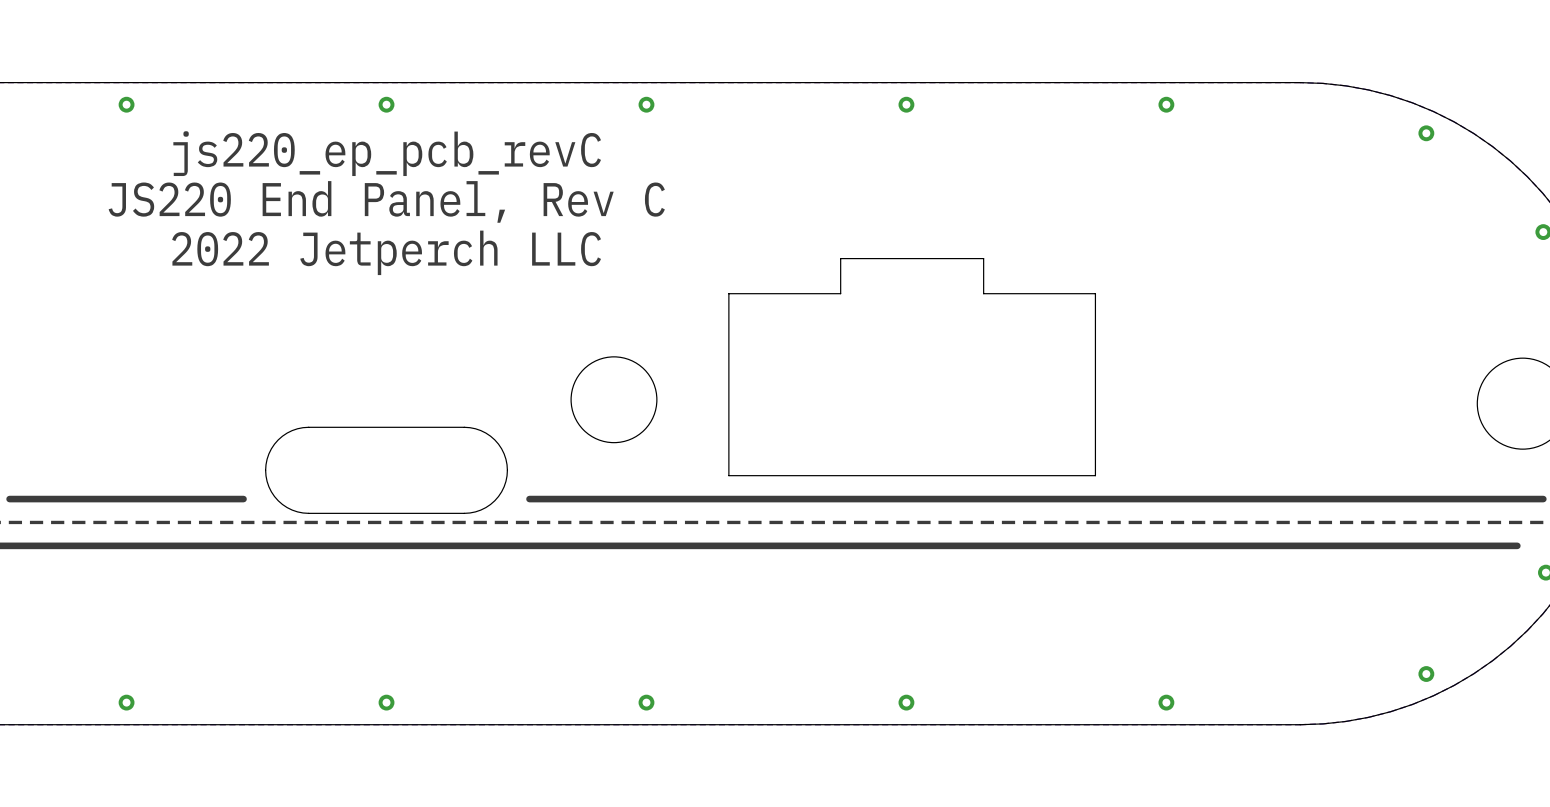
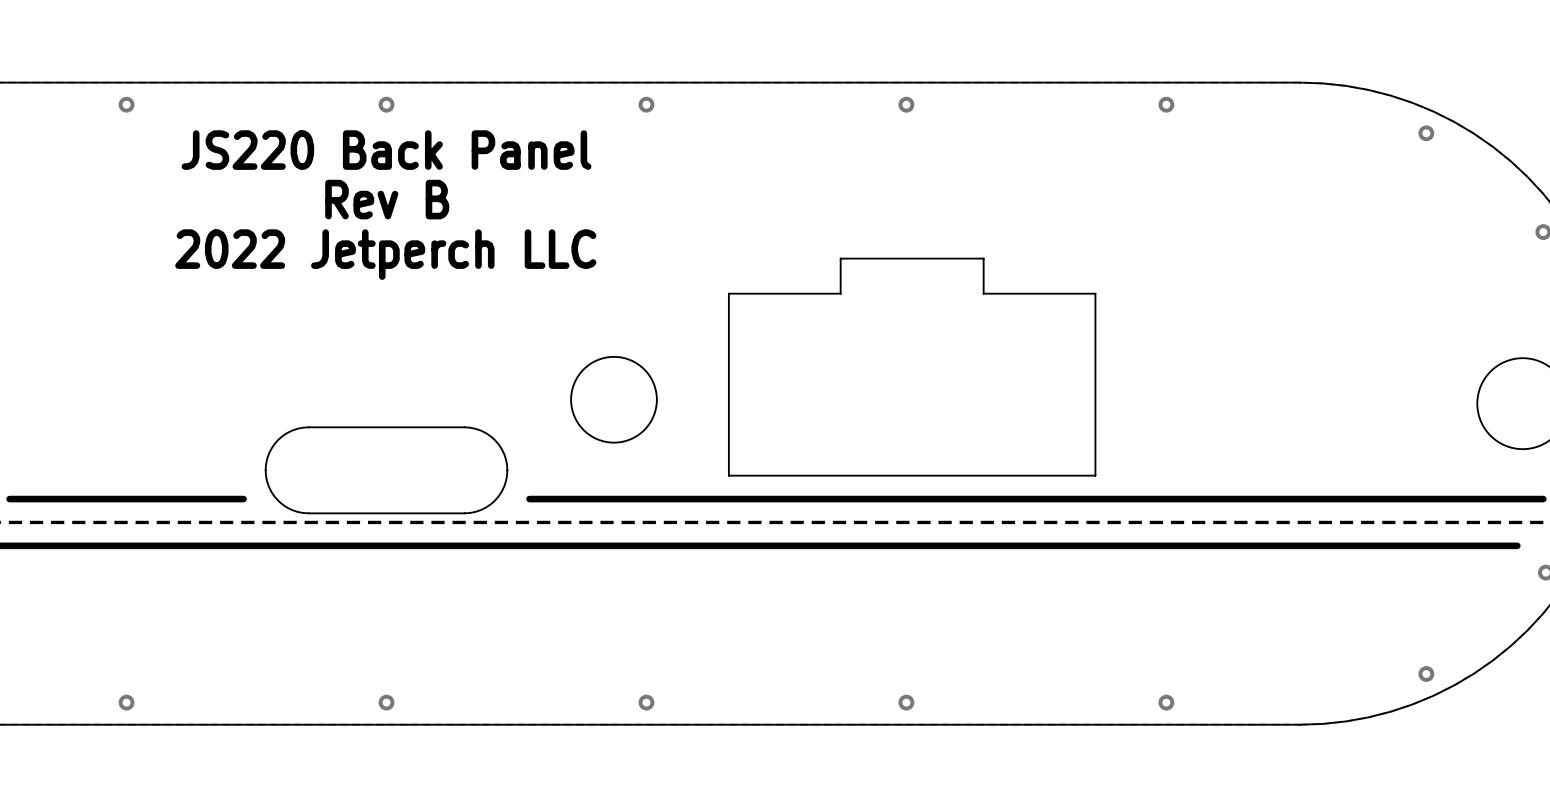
text: js220_ep_pcb_revC (387, 153) -> JS220 Back Panel (386, 150)
text: JS220 End Panel, Rev C (386, 201) -> Rev B (387, 199)

